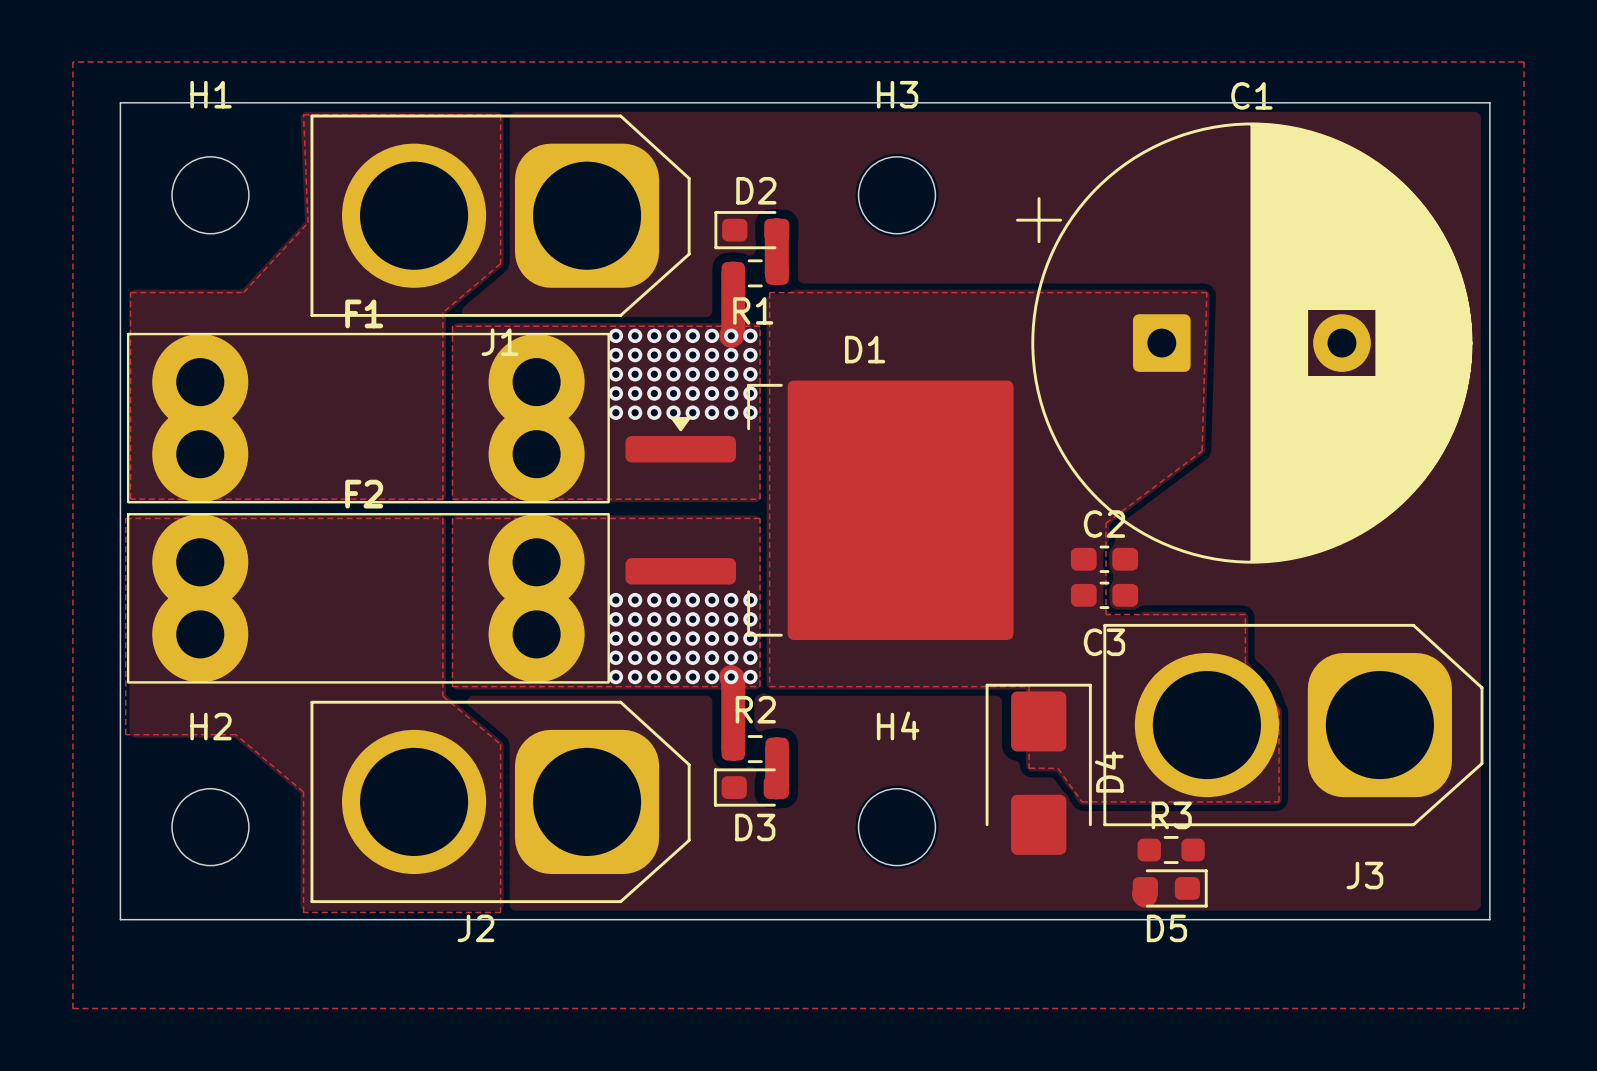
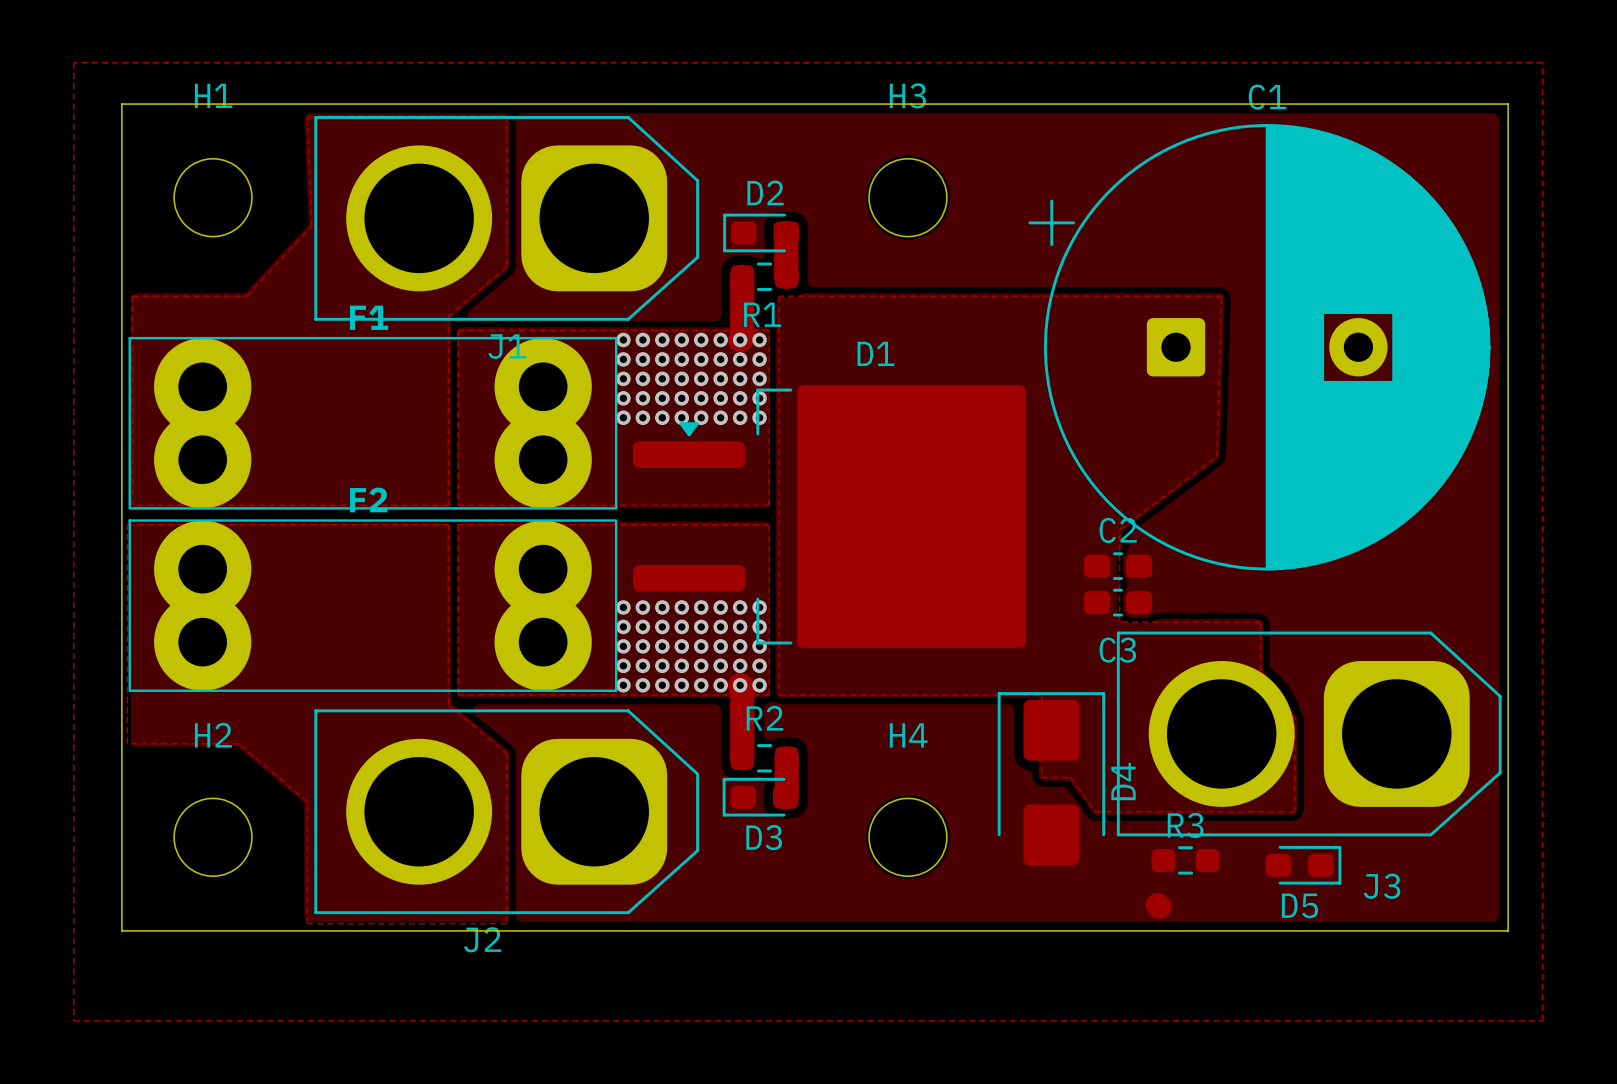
D5 position: (1170, 888) -> (1303, 865)

